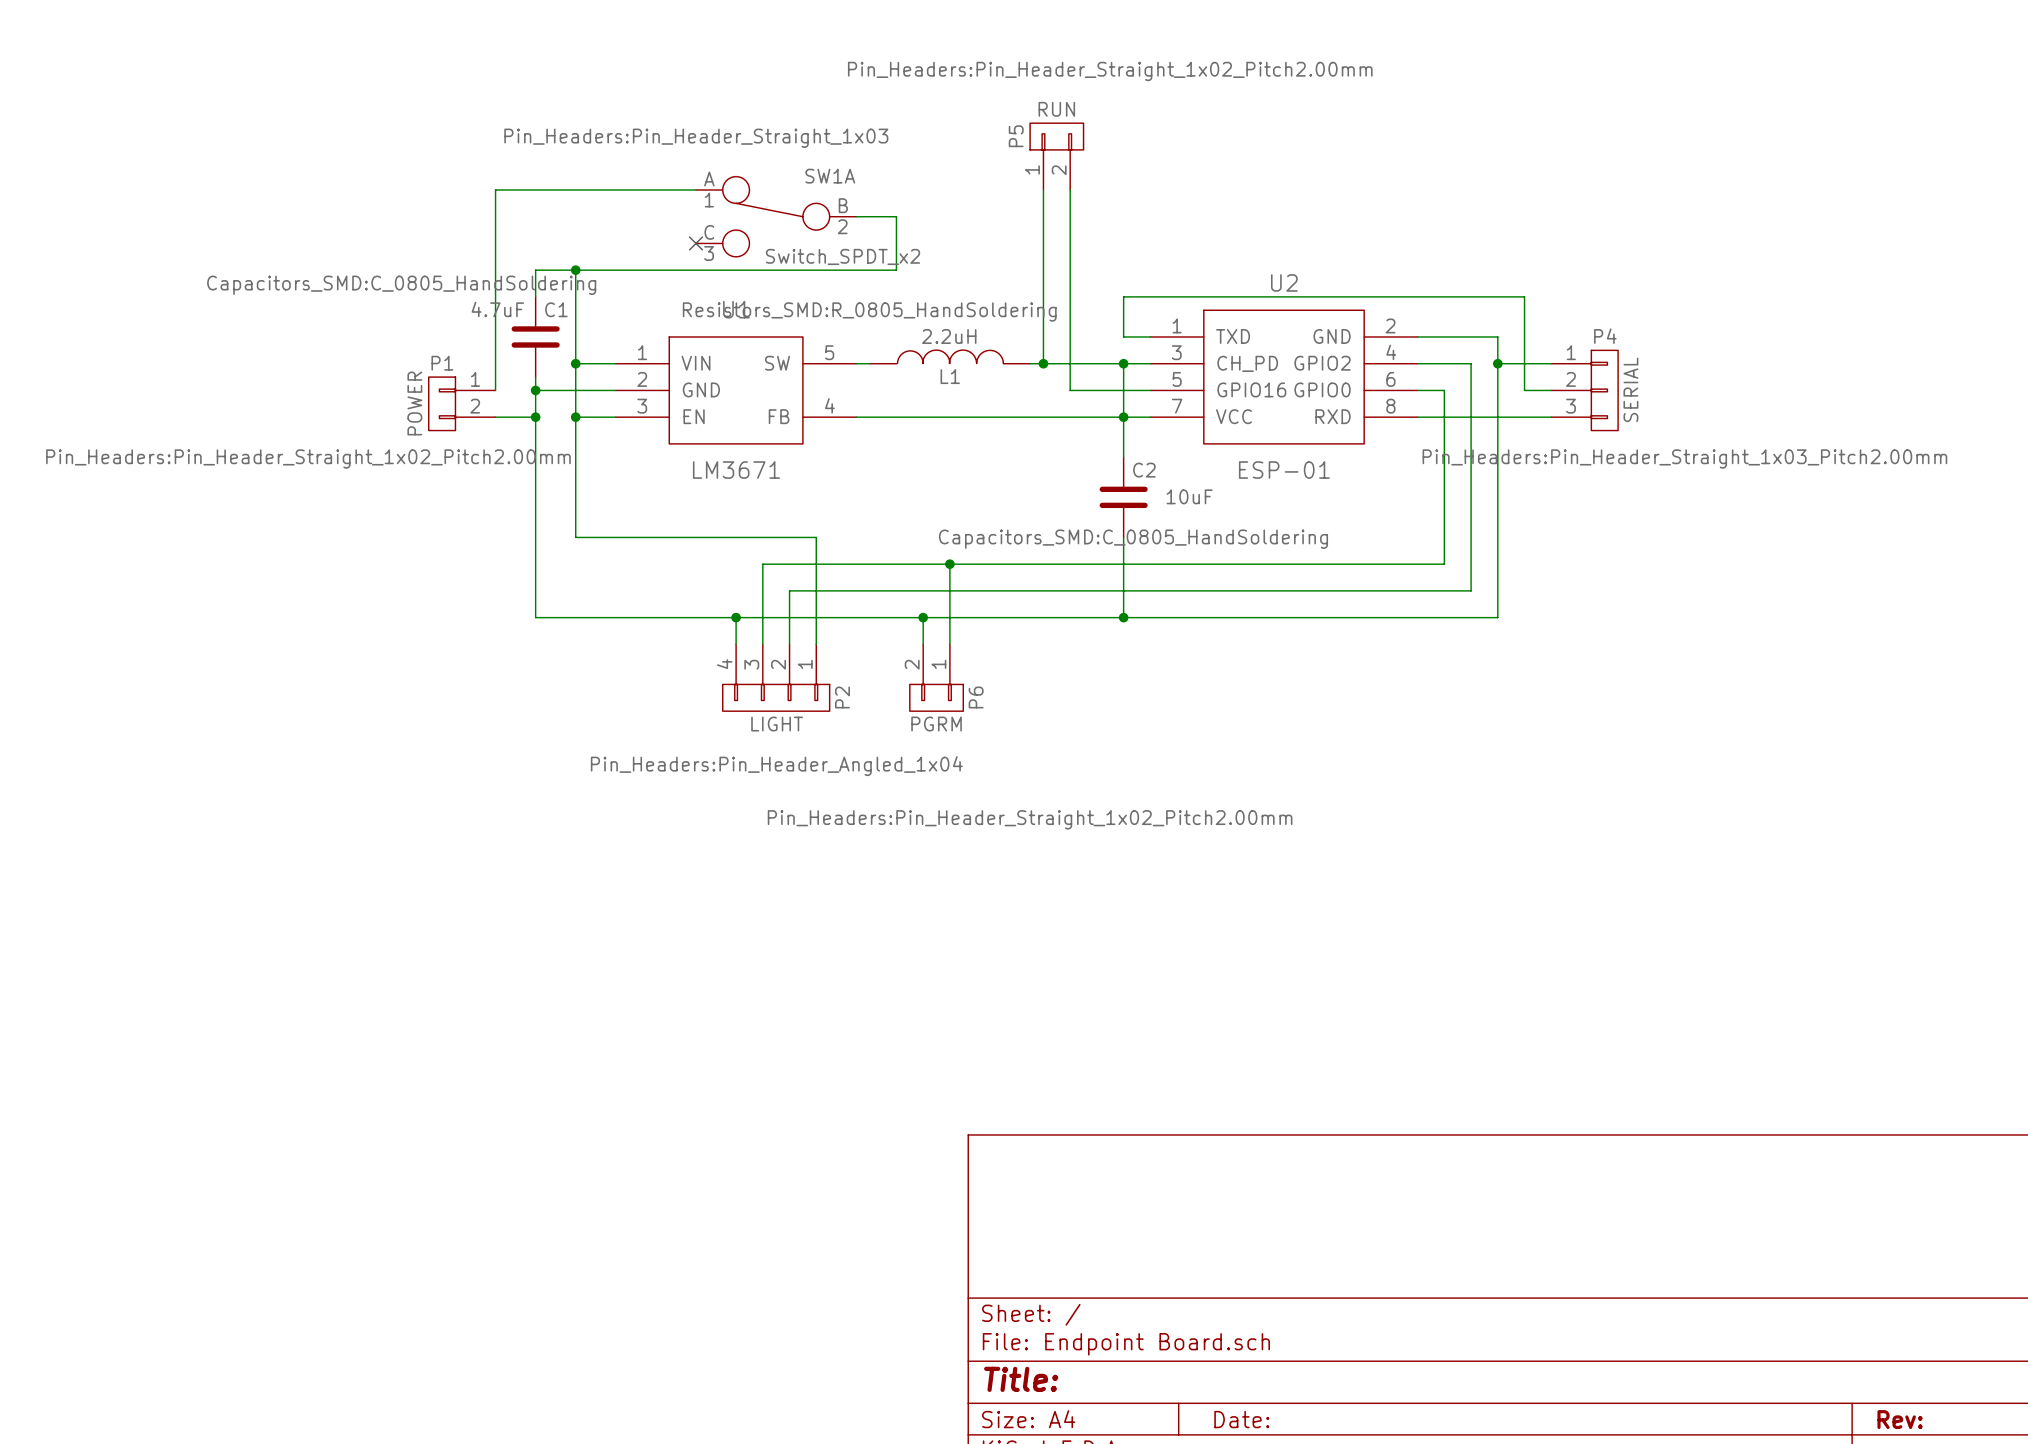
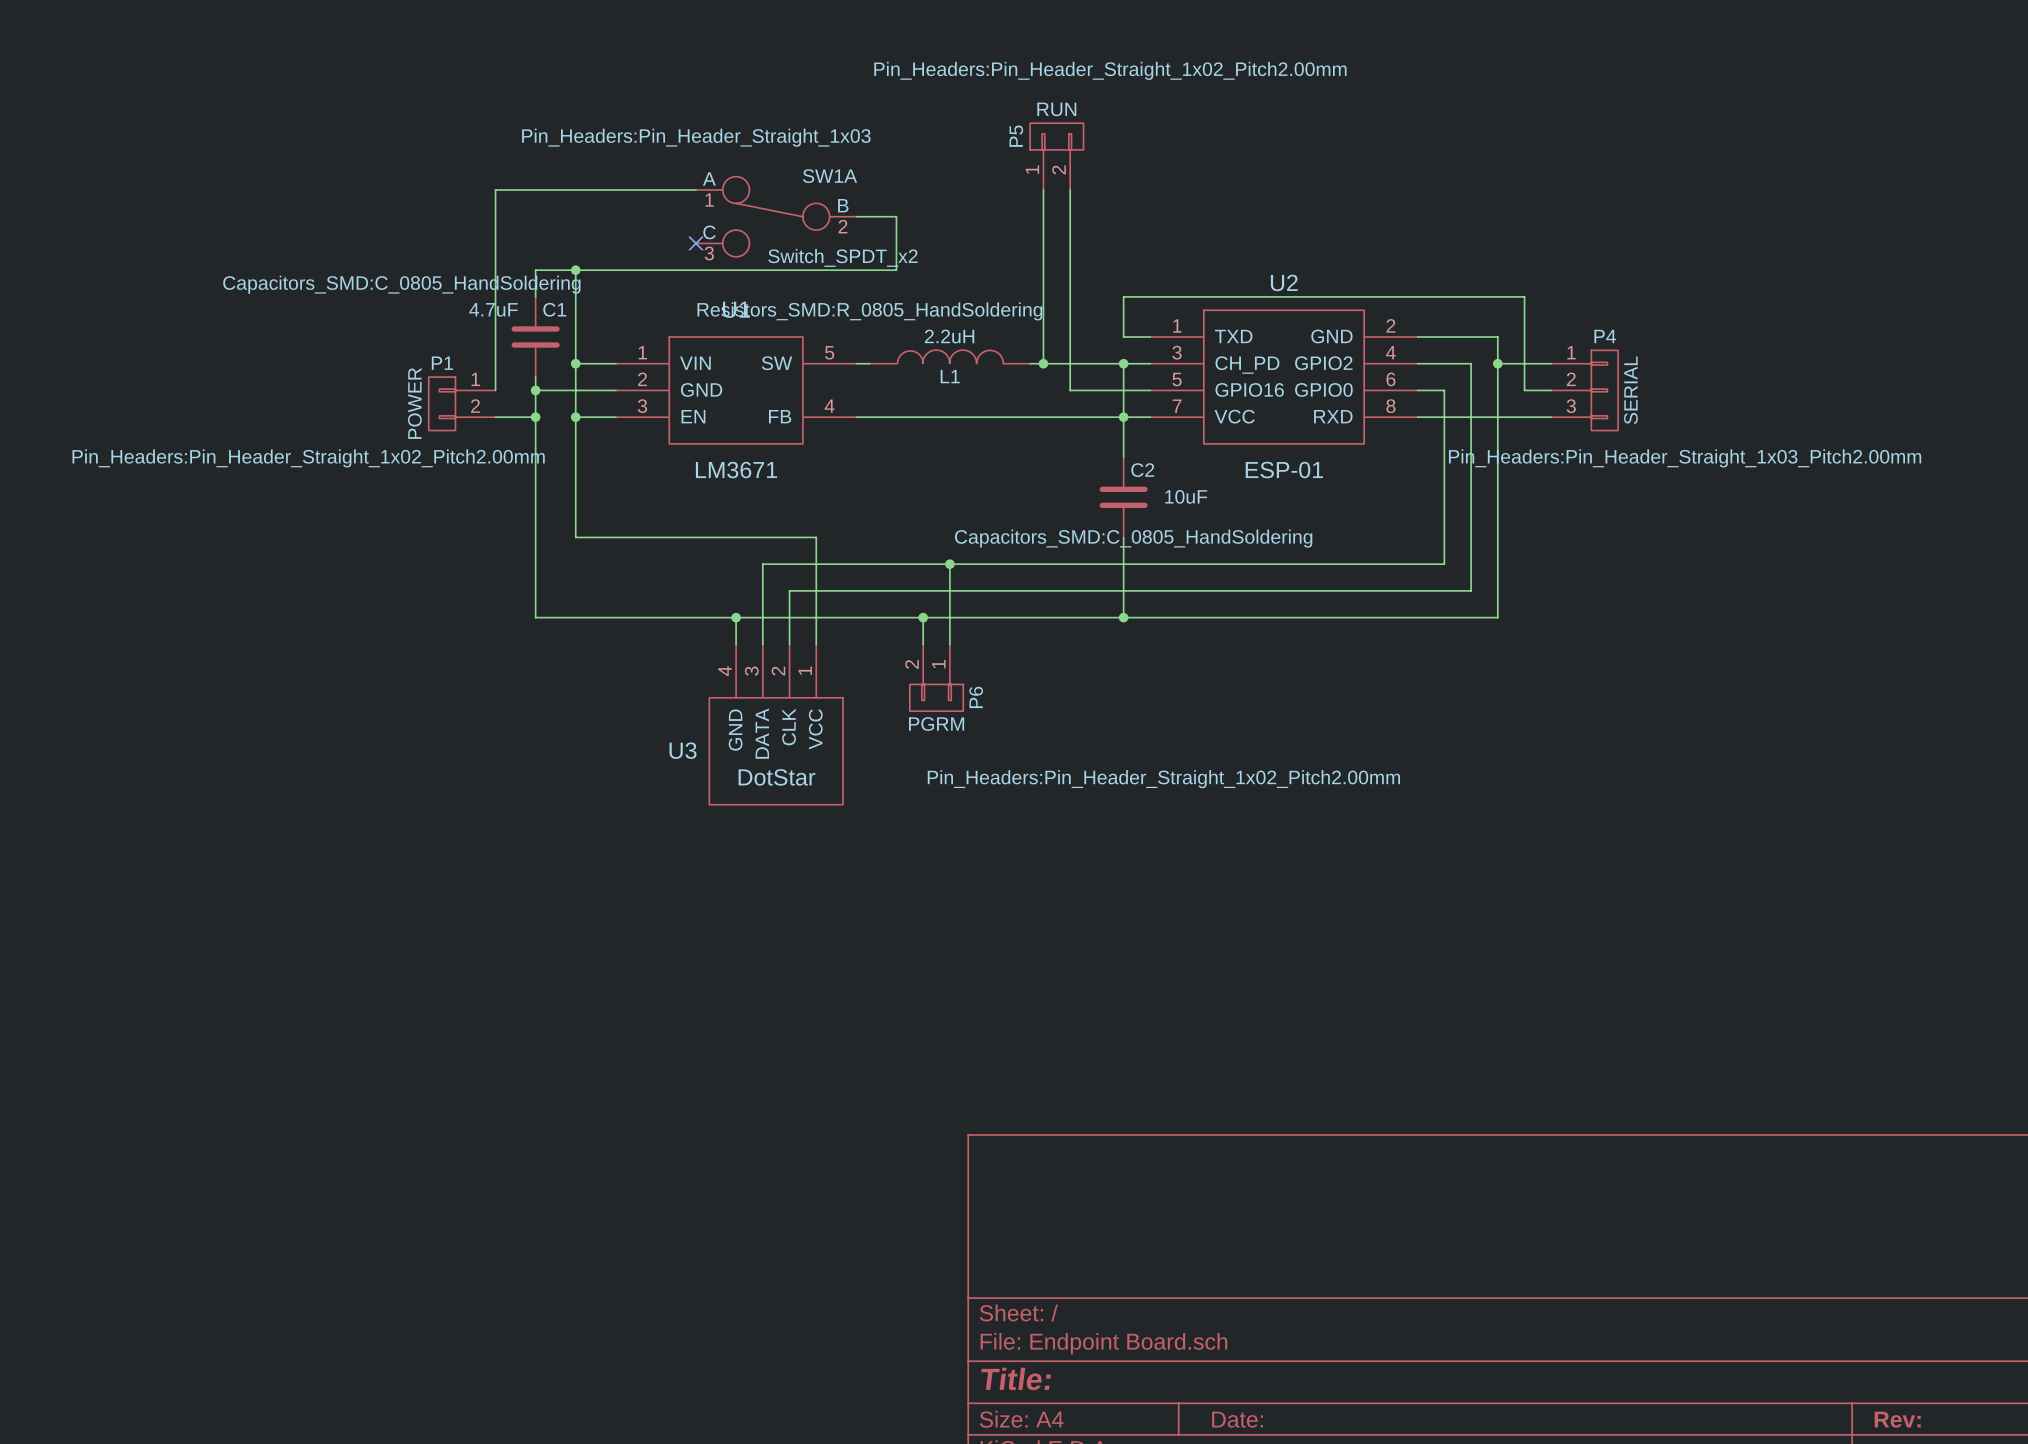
P2: LIGHT (776, 677) -> none
U3: none -> DotStar (776, 724)
P6 text position: Pin_Headers:Pin_Header_Straight_1x02_Pitch2.00mm (1030, 819) -> Pin_Headers:Pin_Header_Straight_1x02_Pitch2.00mm (1163, 779)

